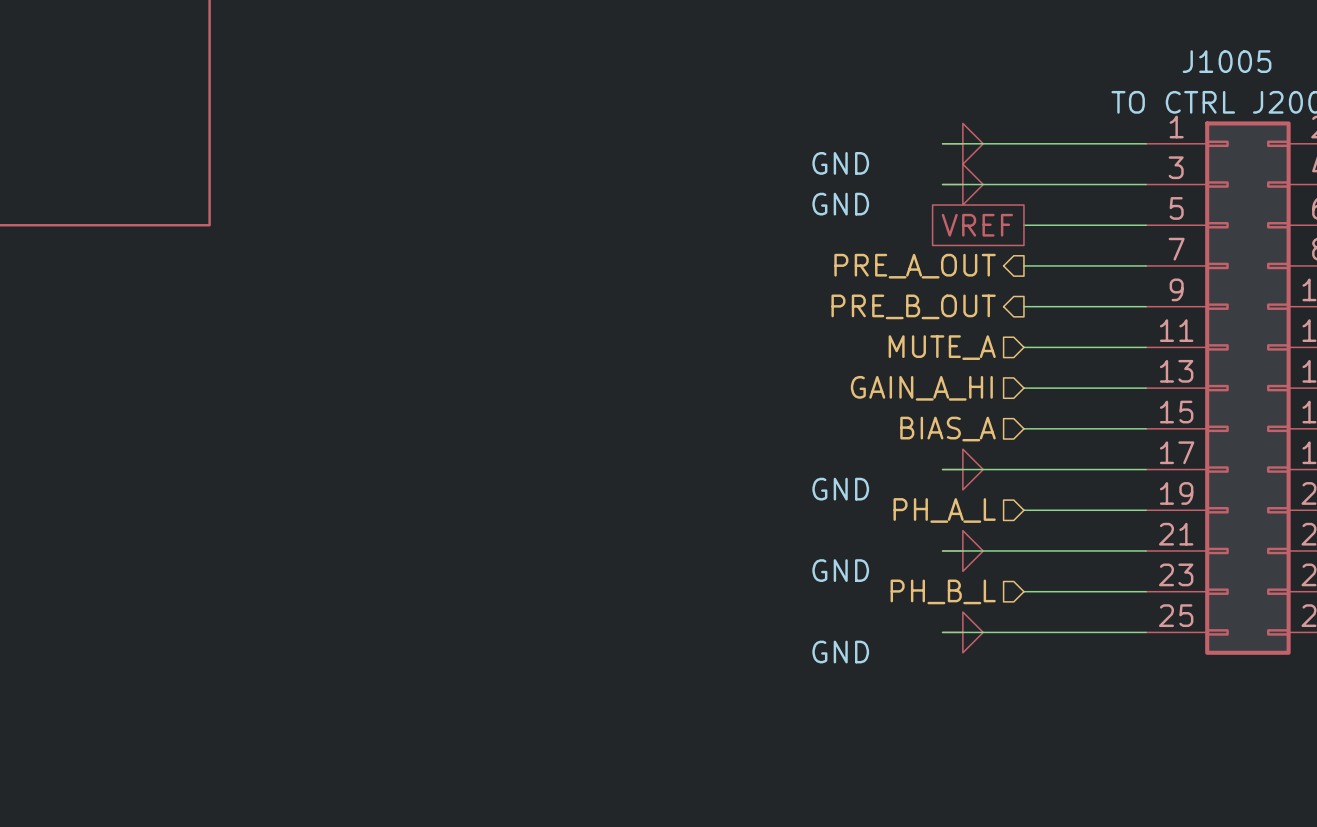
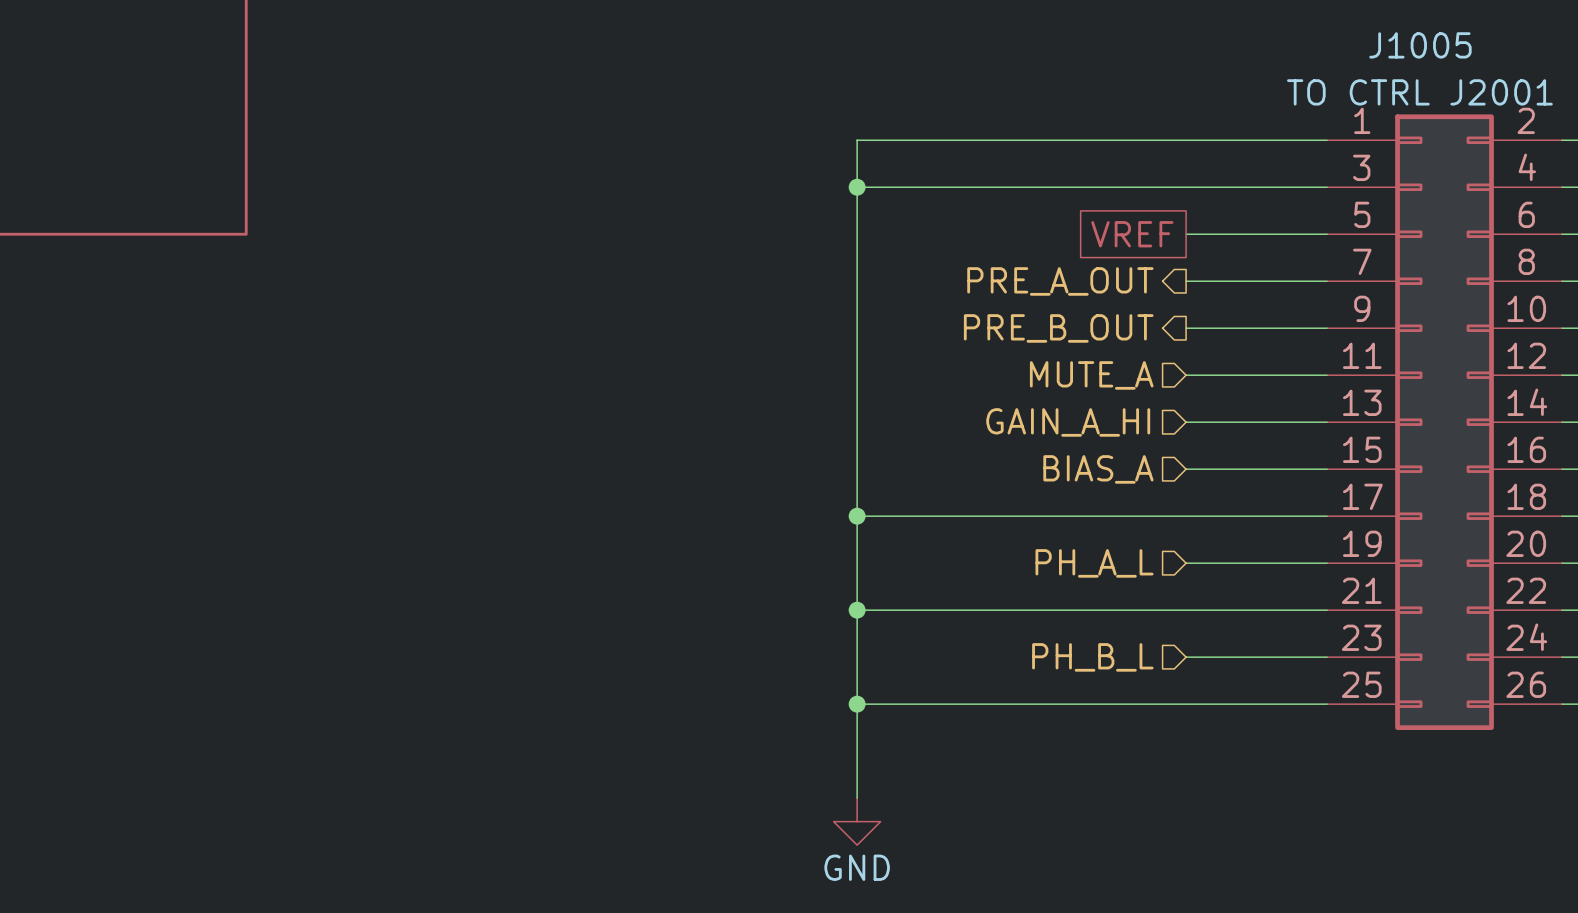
wire: none -> (1092, 140) (857, 140) (857, 798)
power symbol: GND (962, 143) -> none
wire: none -> (857, 187) (1092, 187)
junction: none -> (857, 187)
power symbol: GND (962, 184) -> none
wire: none -> (857, 516) (1092, 516)
junction: none -> (857, 516)
power symbol: GND (962, 469) -> none
wire: none -> (857, 610) (1092, 610)
junction: none -> (857, 610)
power symbol: GND (962, 550) -> none
wire: none -> (857, 704) (1092, 704)
junction: none -> (857, 704)
power symbol: GND (962, 632) -> none
power symbol: none -> GND (857, 821)

